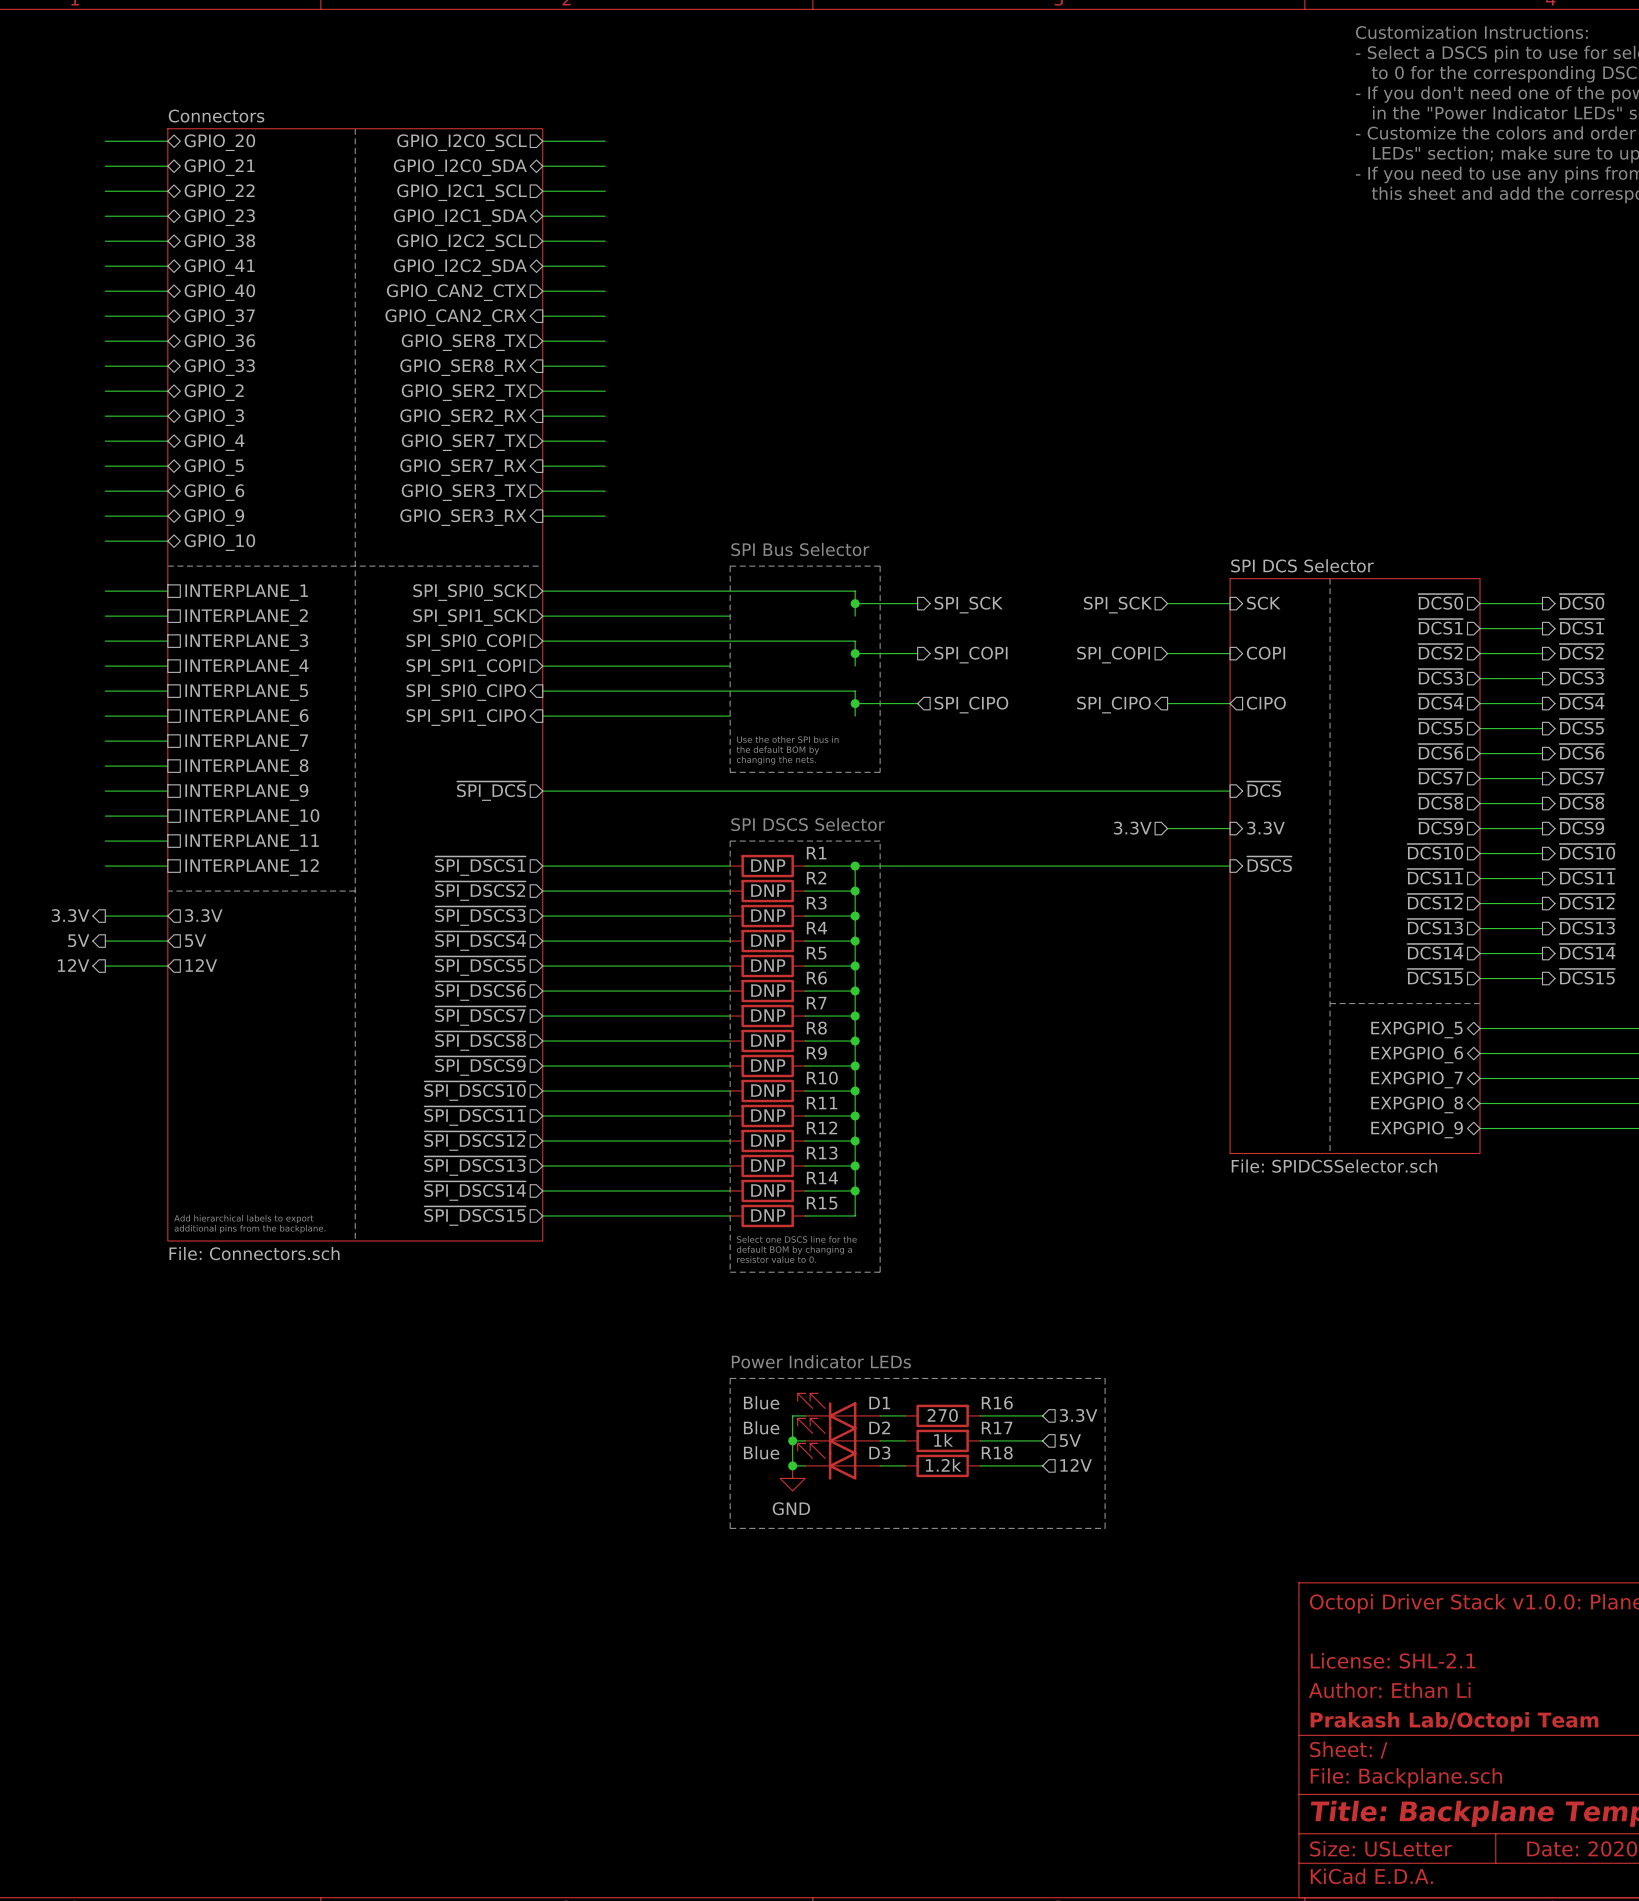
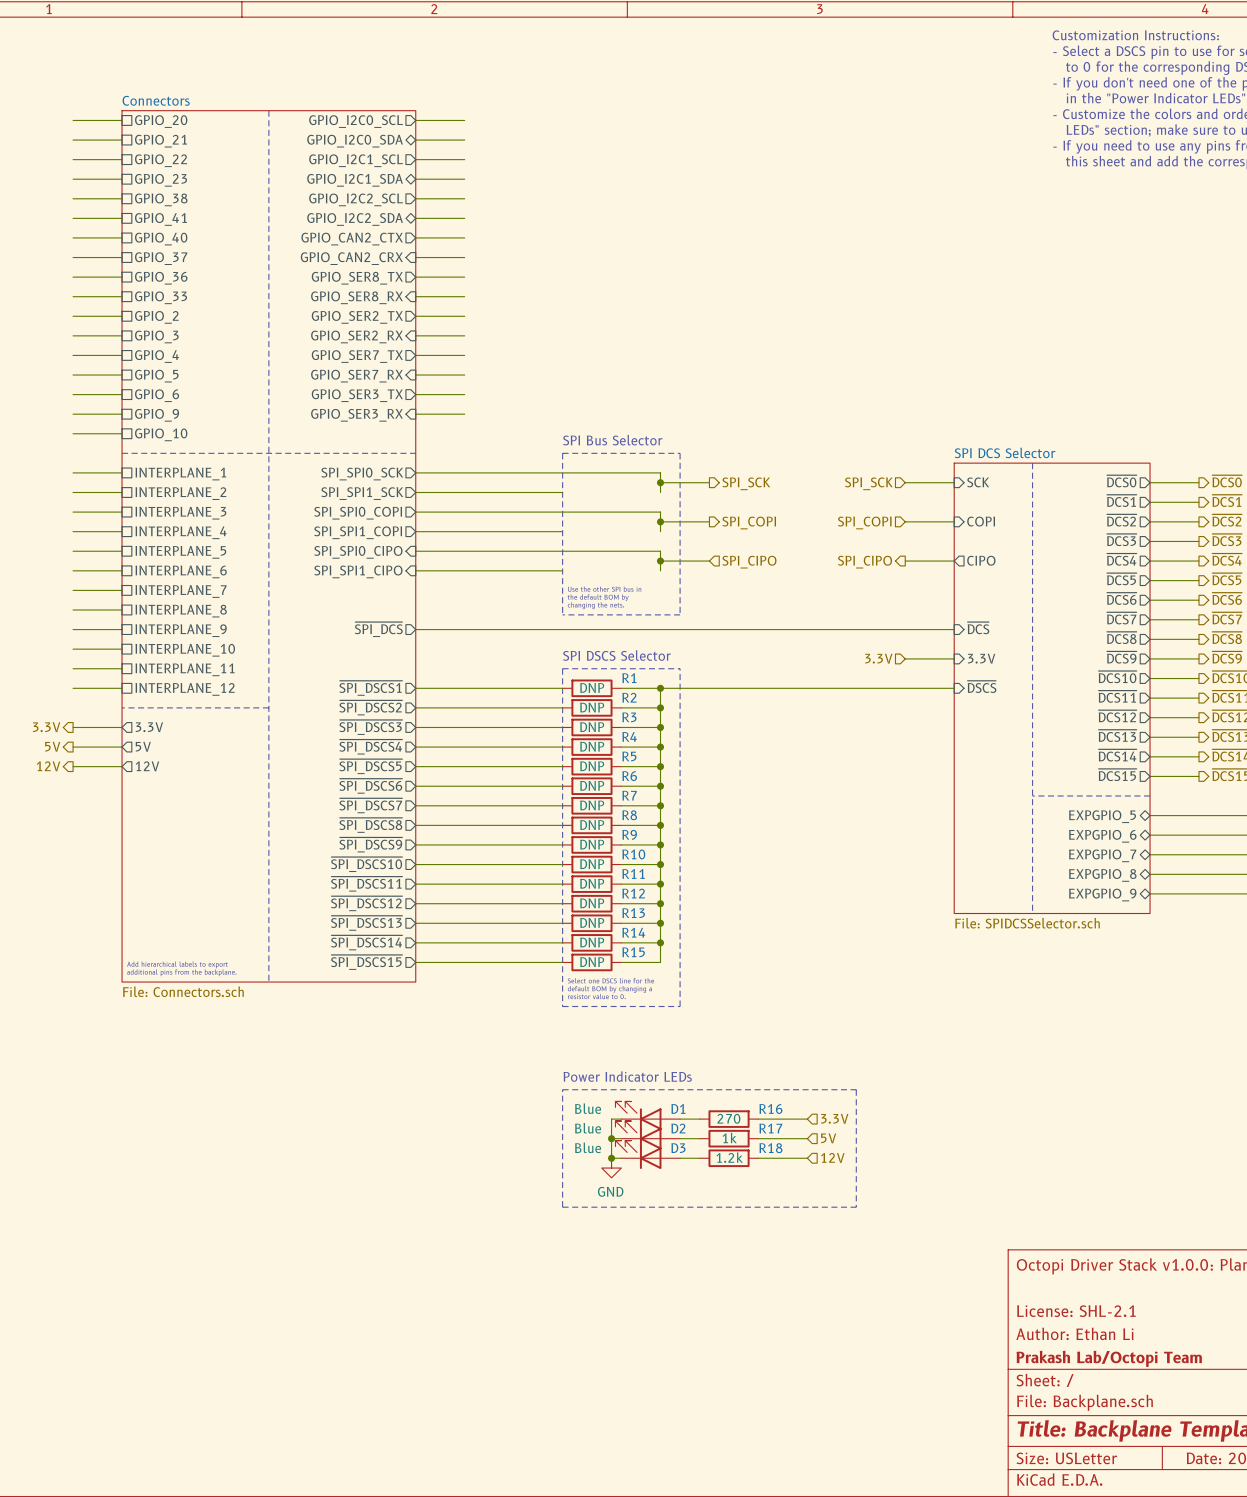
sheet pin shape: bidirectional (219, 142) -> passive (161, 121)
sheet pin shape: bidirectional (219, 167) -> passive (160, 141)
sheet pin shape: bidirectional (219, 192) -> passive (161, 160)
sheet pin shape: bidirectional (219, 217) -> passive (161, 180)
sheet pin shape: bidirectional (219, 242) -> passive (161, 199)
sheet pin shape: bidirectional (219, 267) -> passive (160, 219)
sheet pin shape: bidirectional (219, 292) -> passive (161, 239)
sheet pin shape: bidirectional (219, 317) -> passive (161, 258)
sheet pin shape: bidirectional (219, 342) -> passive (161, 278)
sheet pin shape: bidirectional (219, 367) -> passive (161, 297)
sheet pin shape: bidirectional (214, 392) -> passive (156, 317)
sheet pin shape: bidirectional (214, 417) -> passive (156, 336)
sheet pin shape: bidirectional (214, 442) -> passive (156, 356)
sheet pin shape: bidirectional (214, 467) -> passive (156, 376)
sheet pin shape: bidirectional (214, 492) -> passive (157, 395)
sheet pin shape: bidirectional (214, 517) -> passive (157, 415)
sheet pin shape: bidirectional (219, 542) -> passive (161, 434)

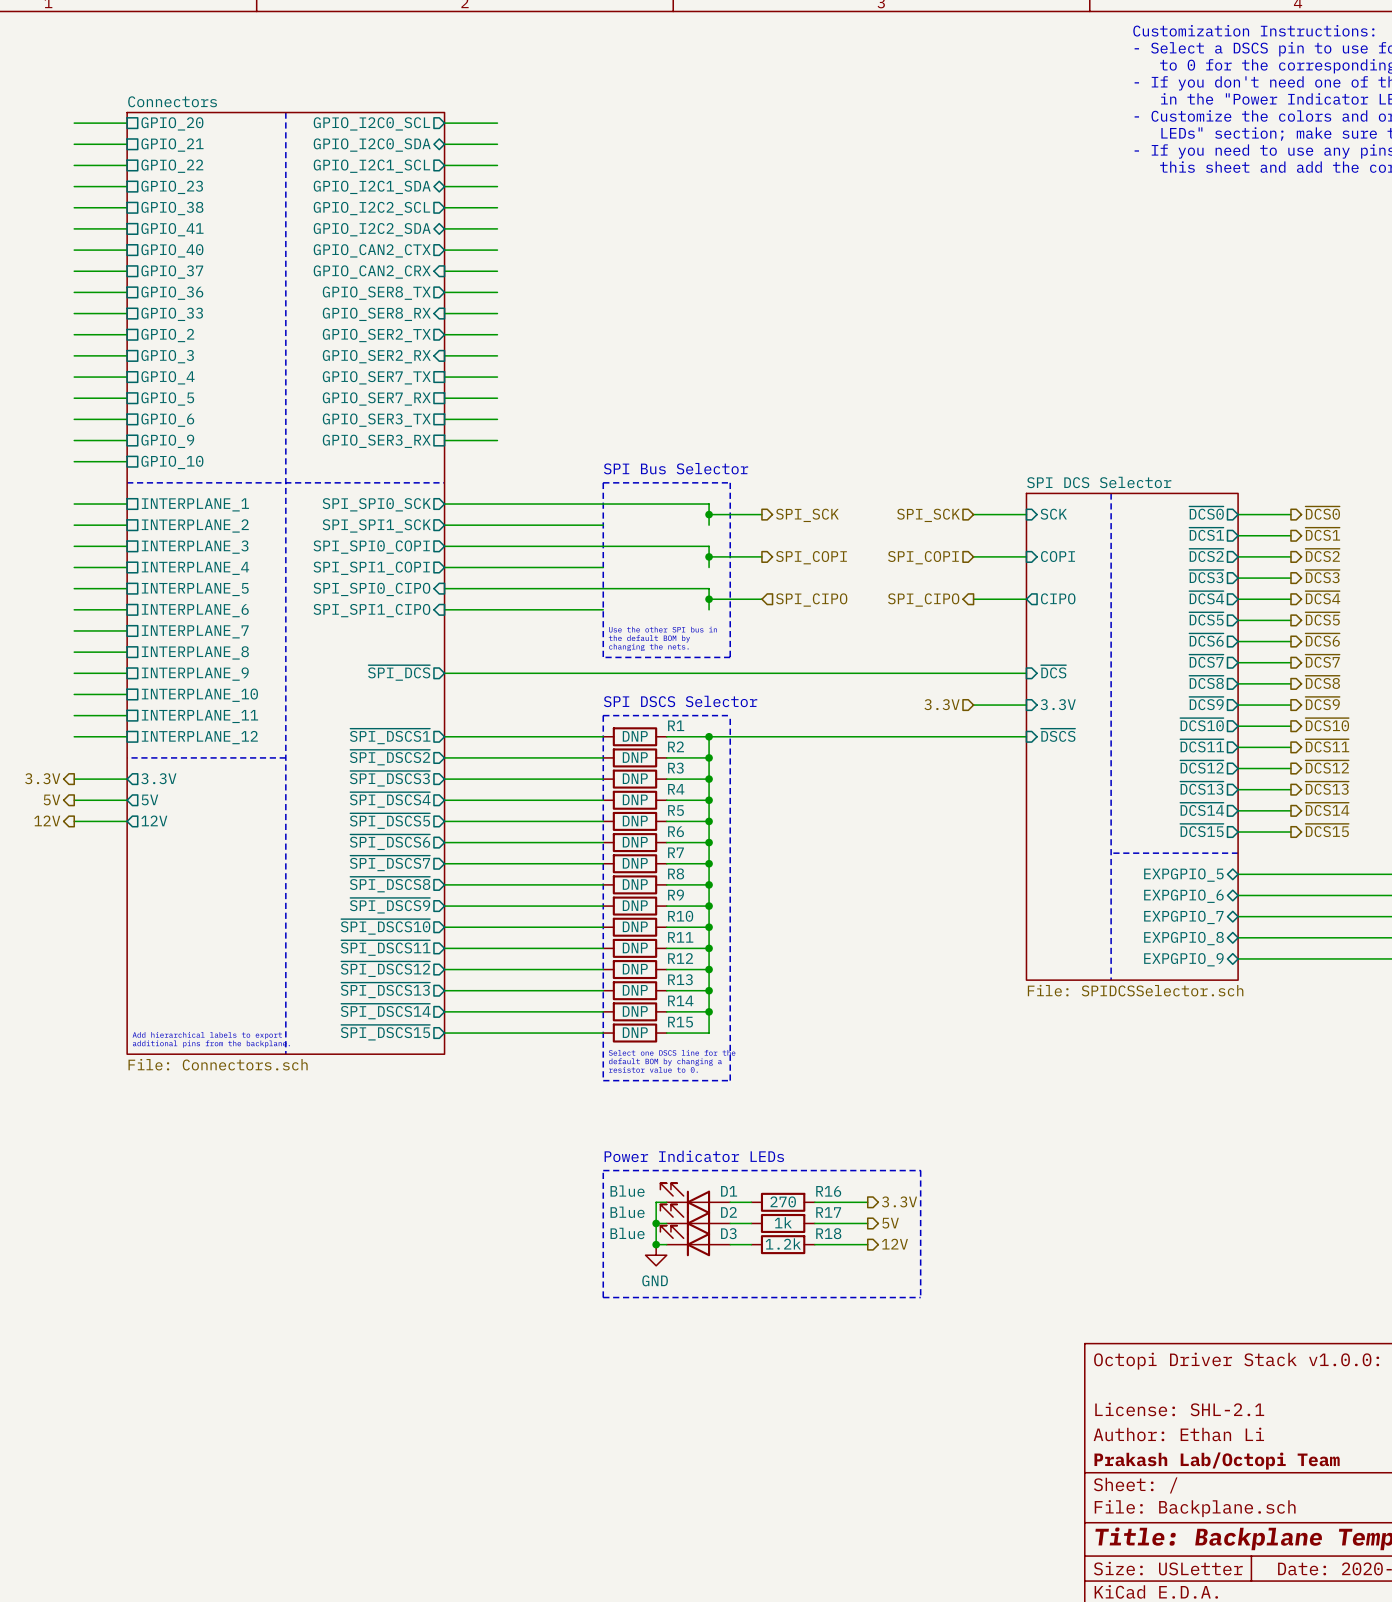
sheet pin shape: output (357, 356) -> passive (376, 377)
sheet pin shape: input (357, 376) -> passive (376, 399)
sheet pin shape: output (357, 395) -> passive (376, 420)
sheet pin shape: input (357, 415) -> passive (376, 441)
hierarchical label shape: input (834, 1118) -> output (899, 1201)
hierarchical label shape: input (828, 1138) -> output (890, 1223)
hierarchical label shape: input (832, 1157) -> output (894, 1244)

